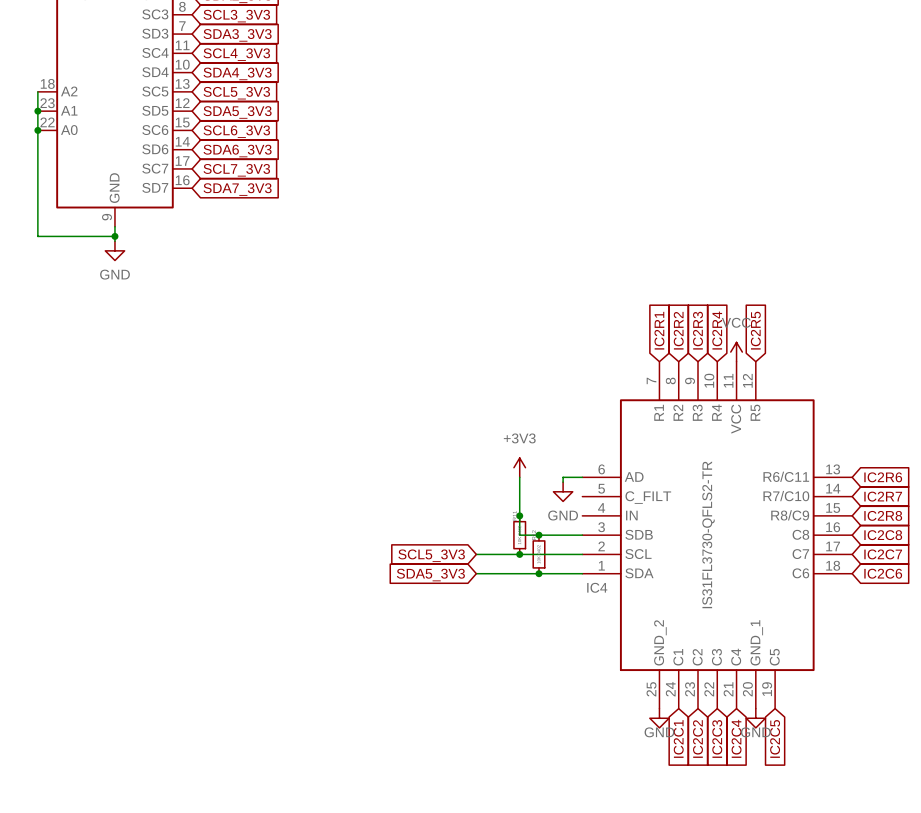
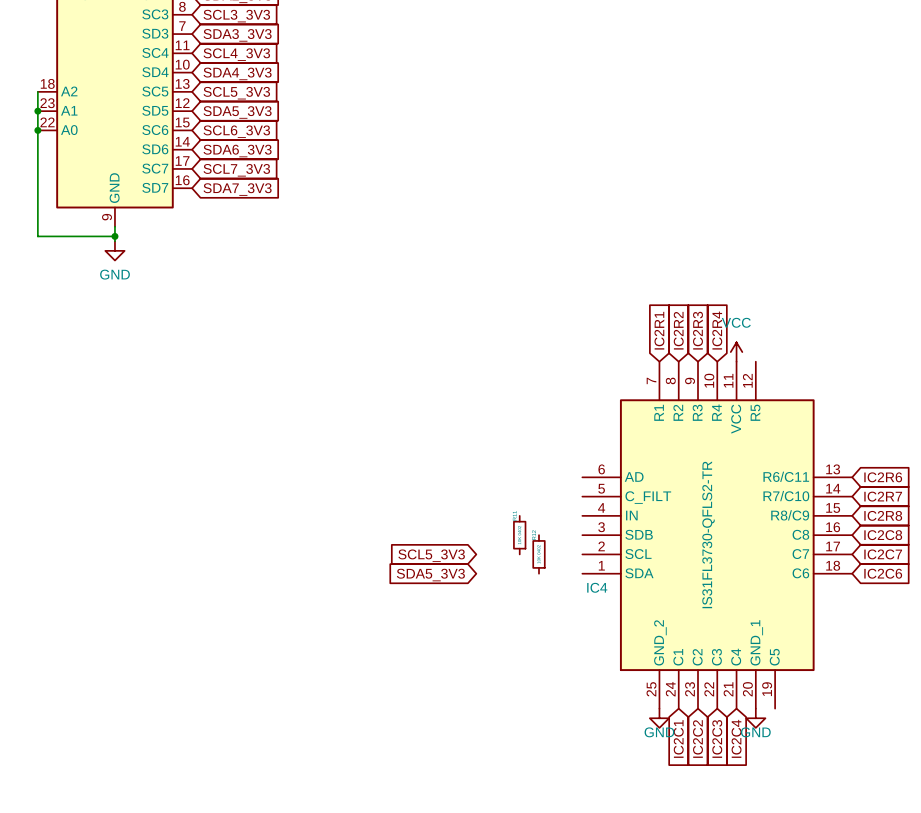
global label: IC2R5 (755, 330) -> none
power symbol: +3V3 (519, 467) -> none
wire: (519, 477) (519, 535) (582, 535) -> none
wire: (582, 477) (563, 477) (563, 482) -> none
power symbol: GND (563, 491) -> none
junction: (519, 515) -> none
junction: (538, 535) -> none
wire: (476, 554) (582, 554) -> none
junction: (519, 554) -> none
wire: (476, 573) (582, 573) -> none
junction: (538, 573) -> none
global label: IC2C5 (775, 738) -> none

